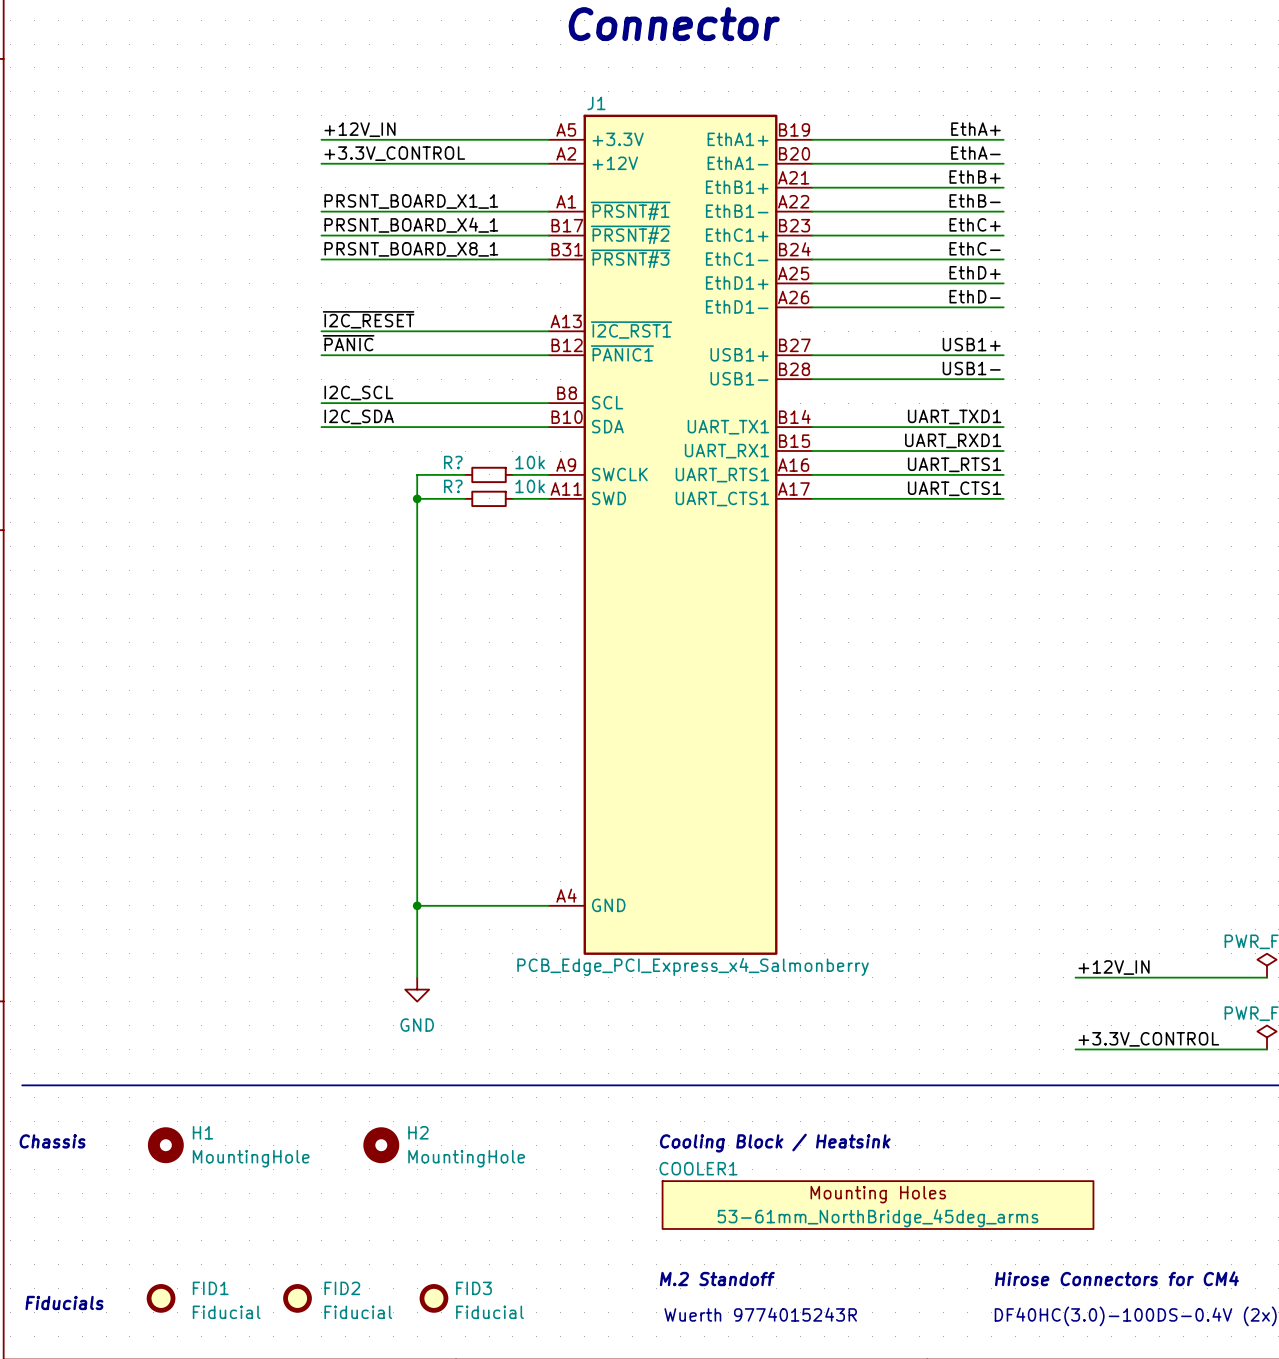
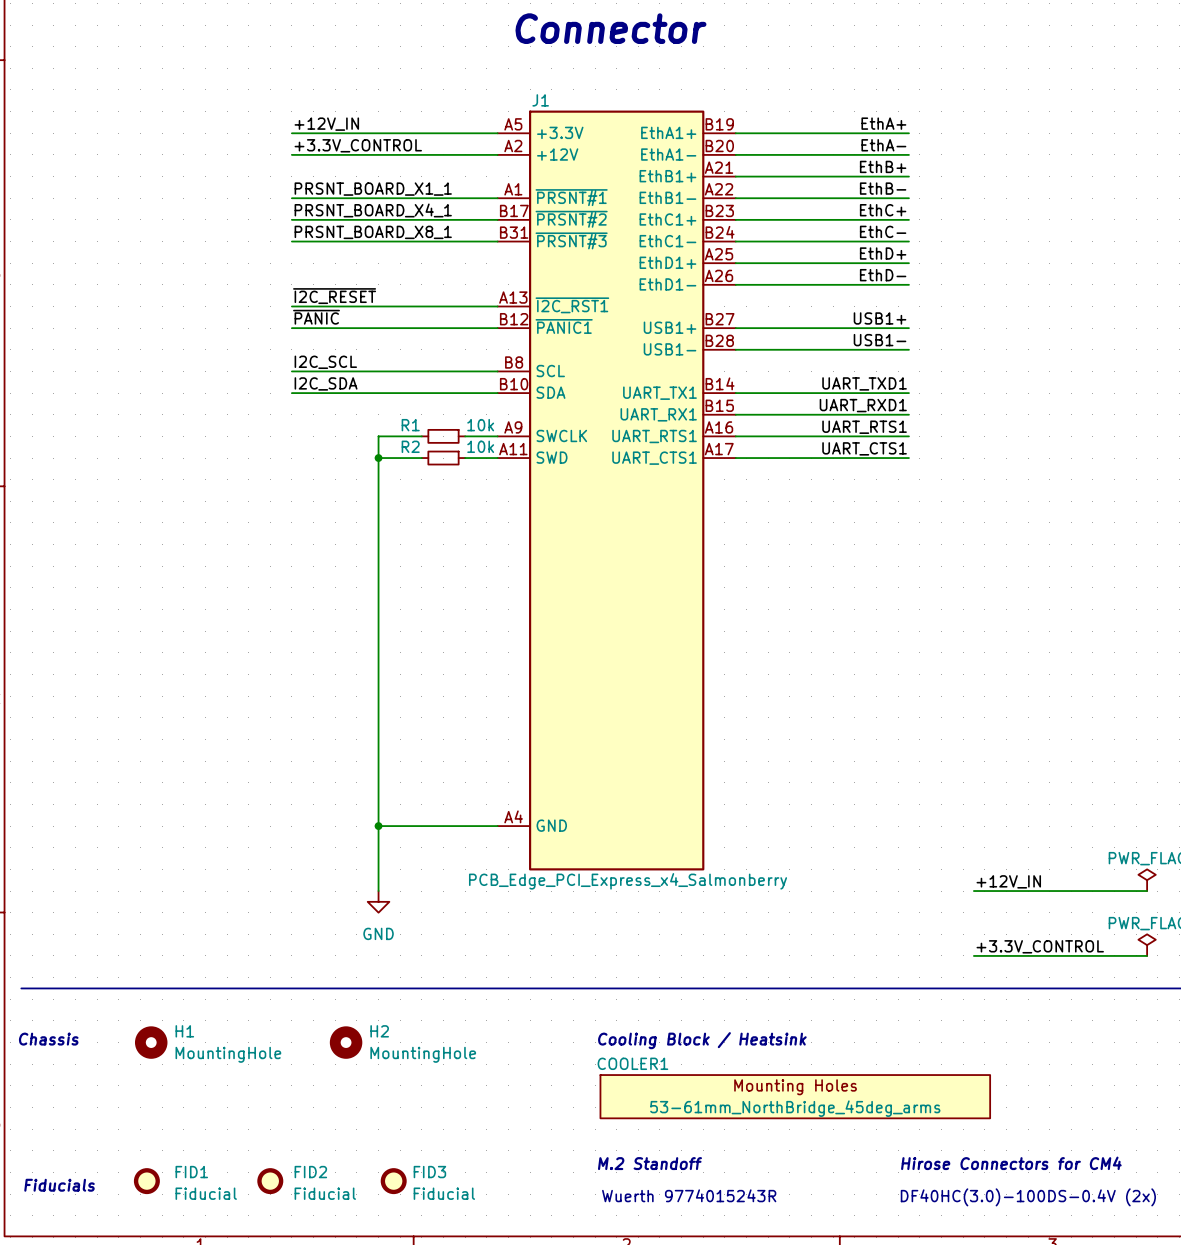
R? name: R? (453, 462) -> R1 (410, 425)
R? name: R? (453, 486) -> R2 (410, 446)

